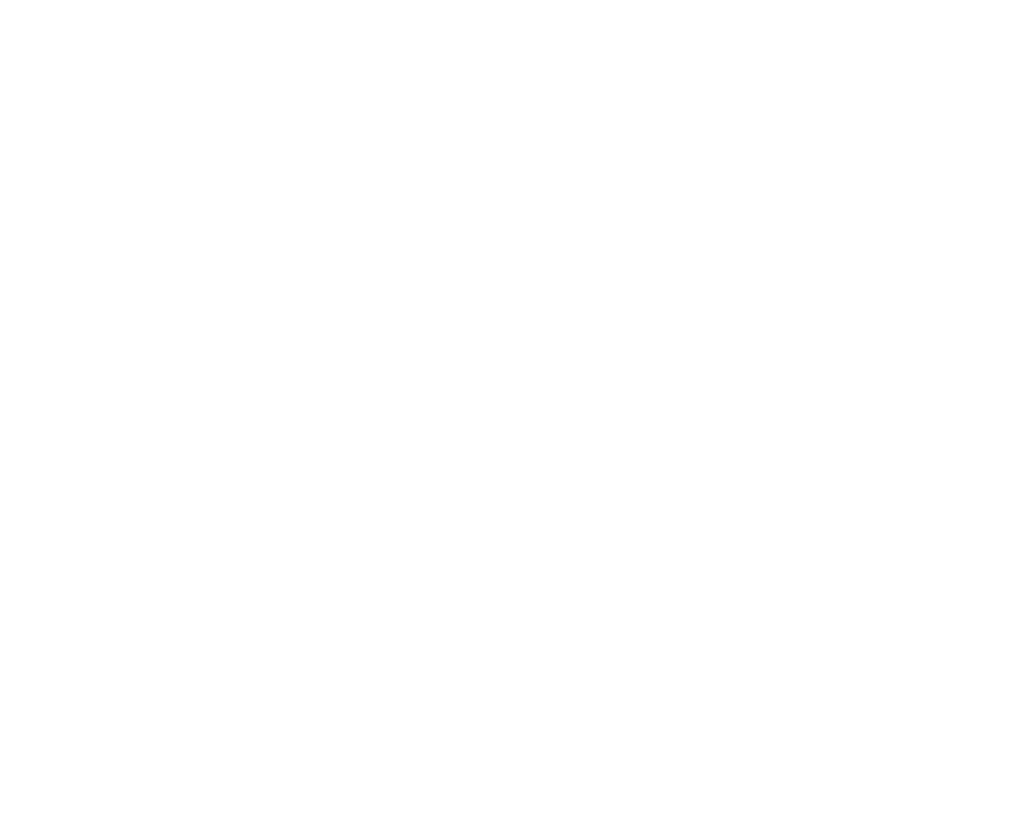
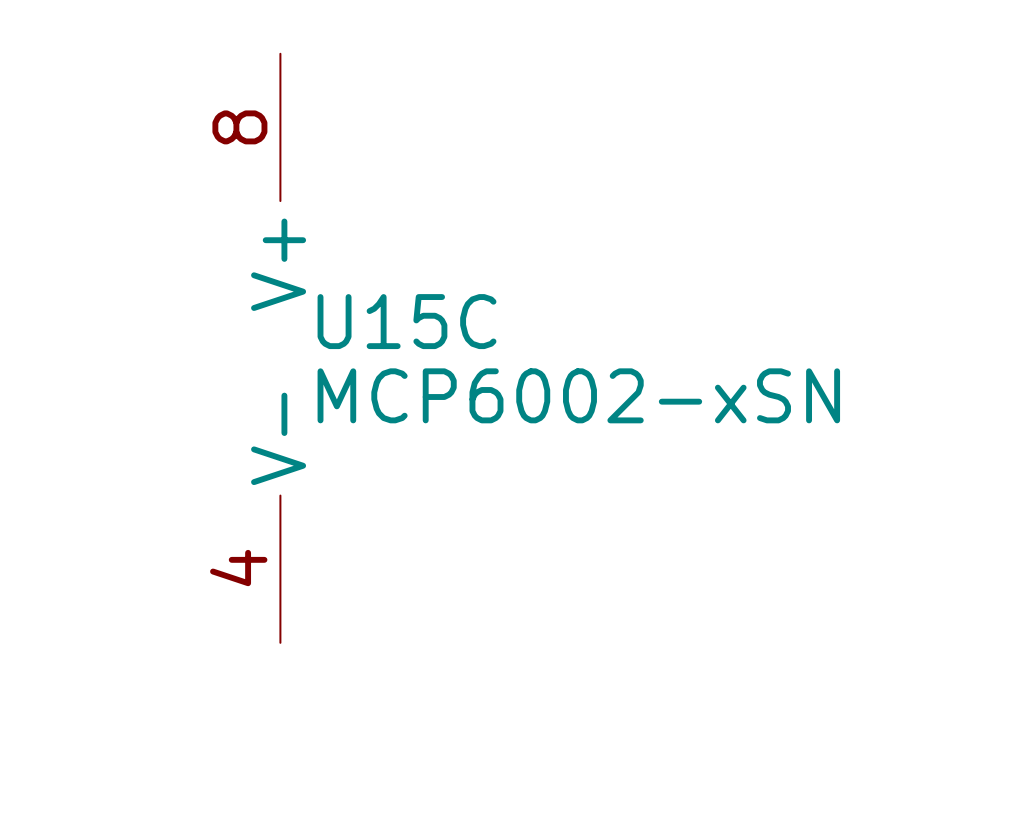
U15C: none -> MCP6002-xSN (280, 348)

